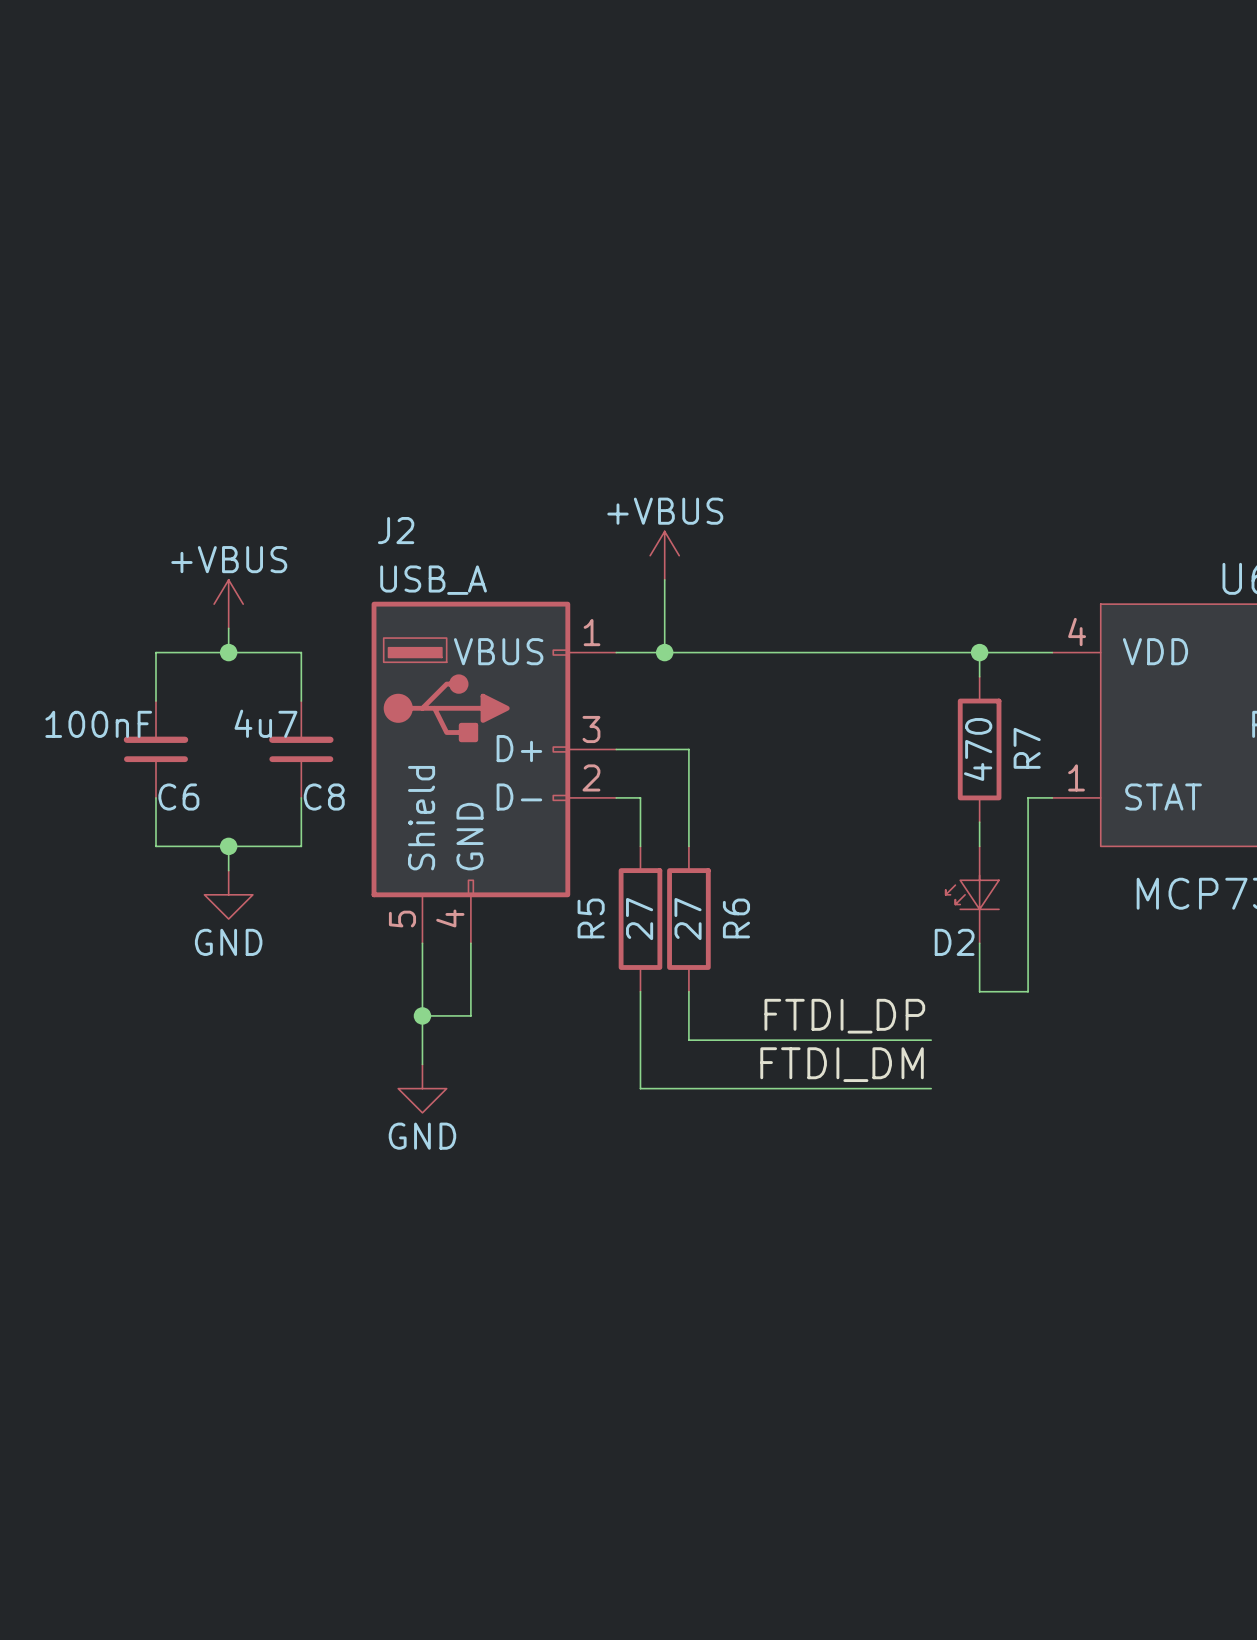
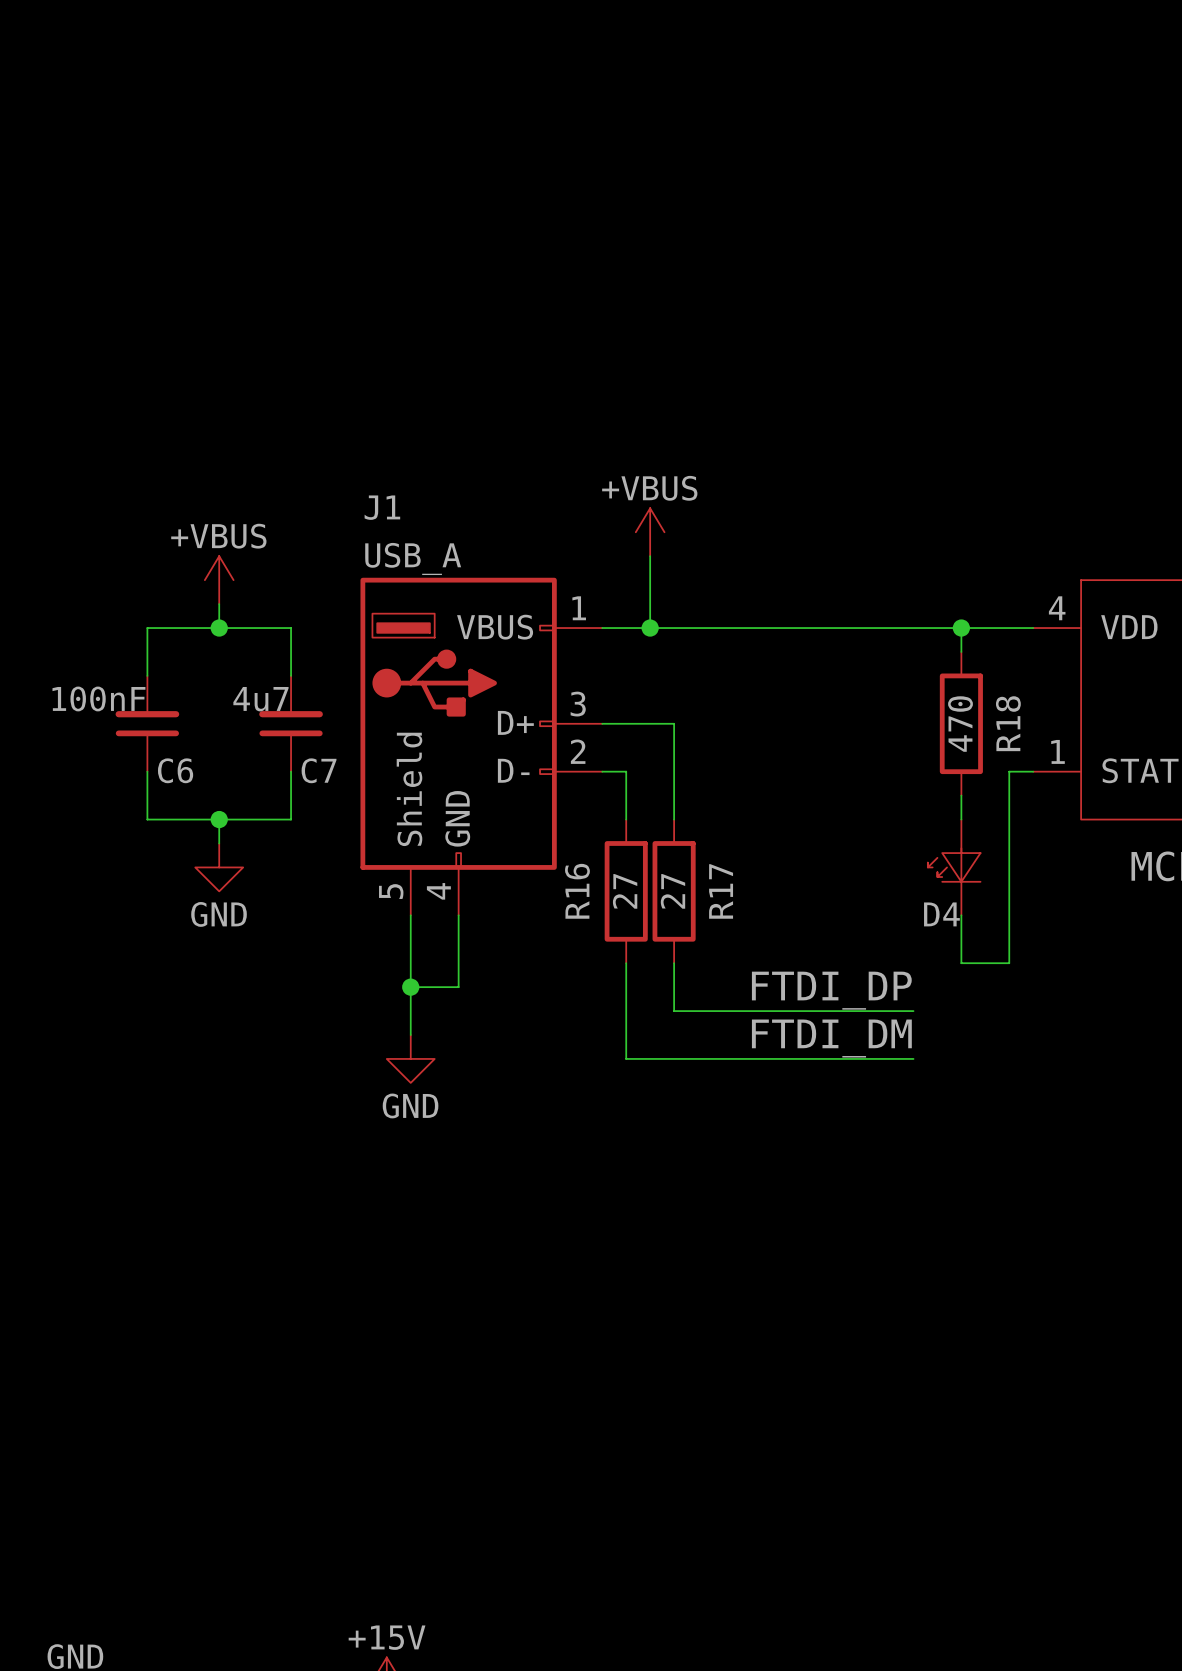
J2 name: J2 (396, 530) -> J1 (382, 507)
R7 name: R7 (1027, 748) -> R18 (1008, 723)
C8 name: C8 (324, 797) -> C7 (319, 770)
R5 name: R5 (591, 918) -> R16 (577, 891)
R6 name: R6 (736, 918) -> R17 (721, 891)
D2 name: D2 (954, 942) -> D4 (941, 914)

